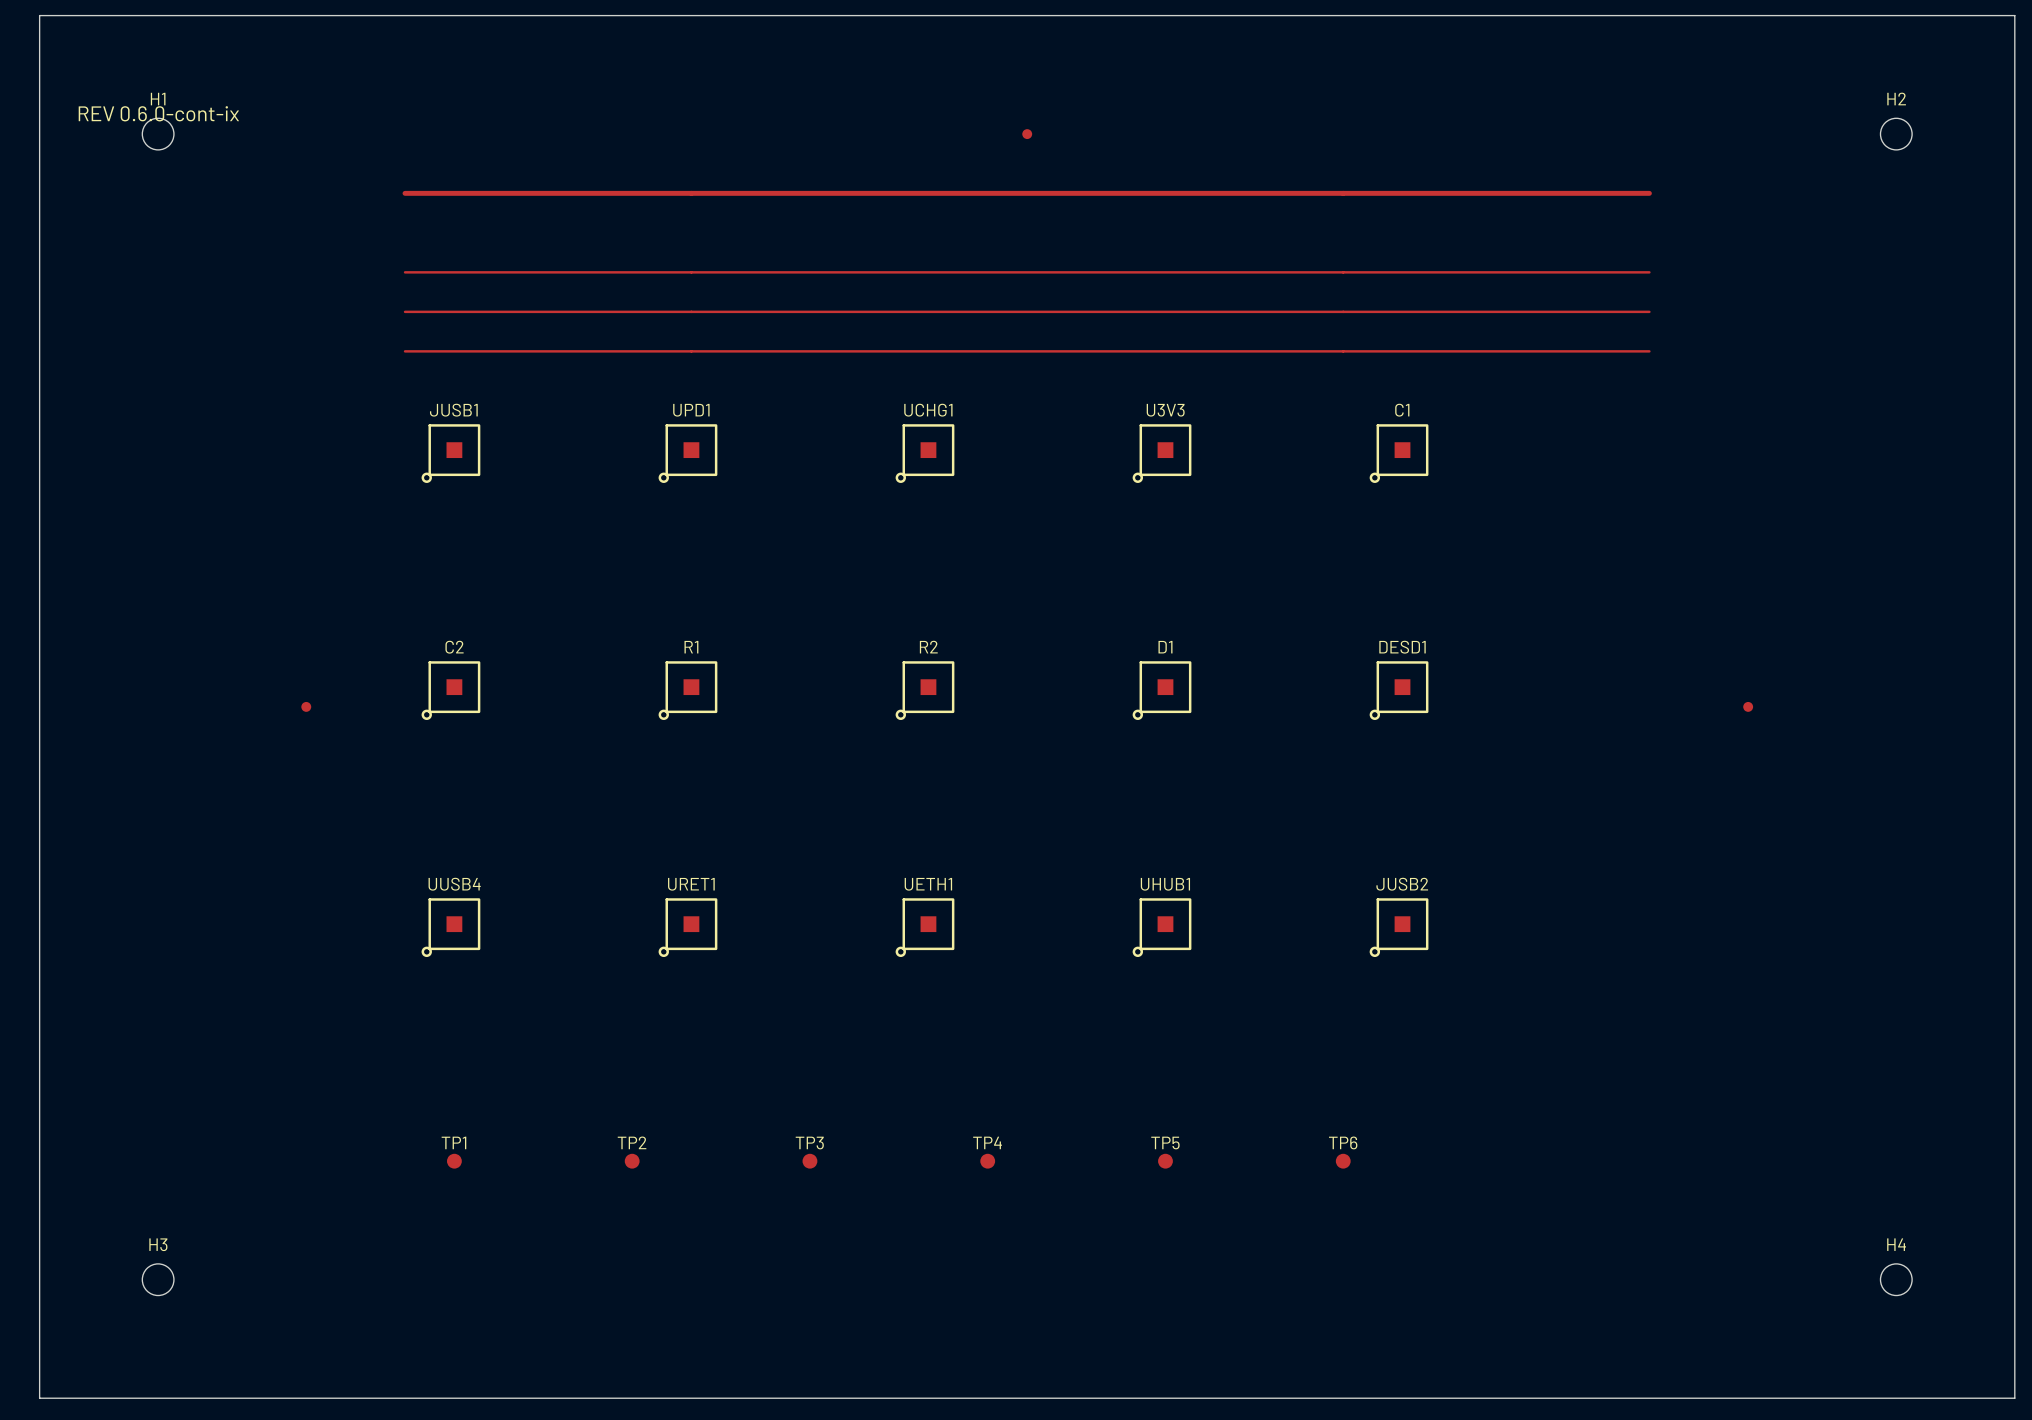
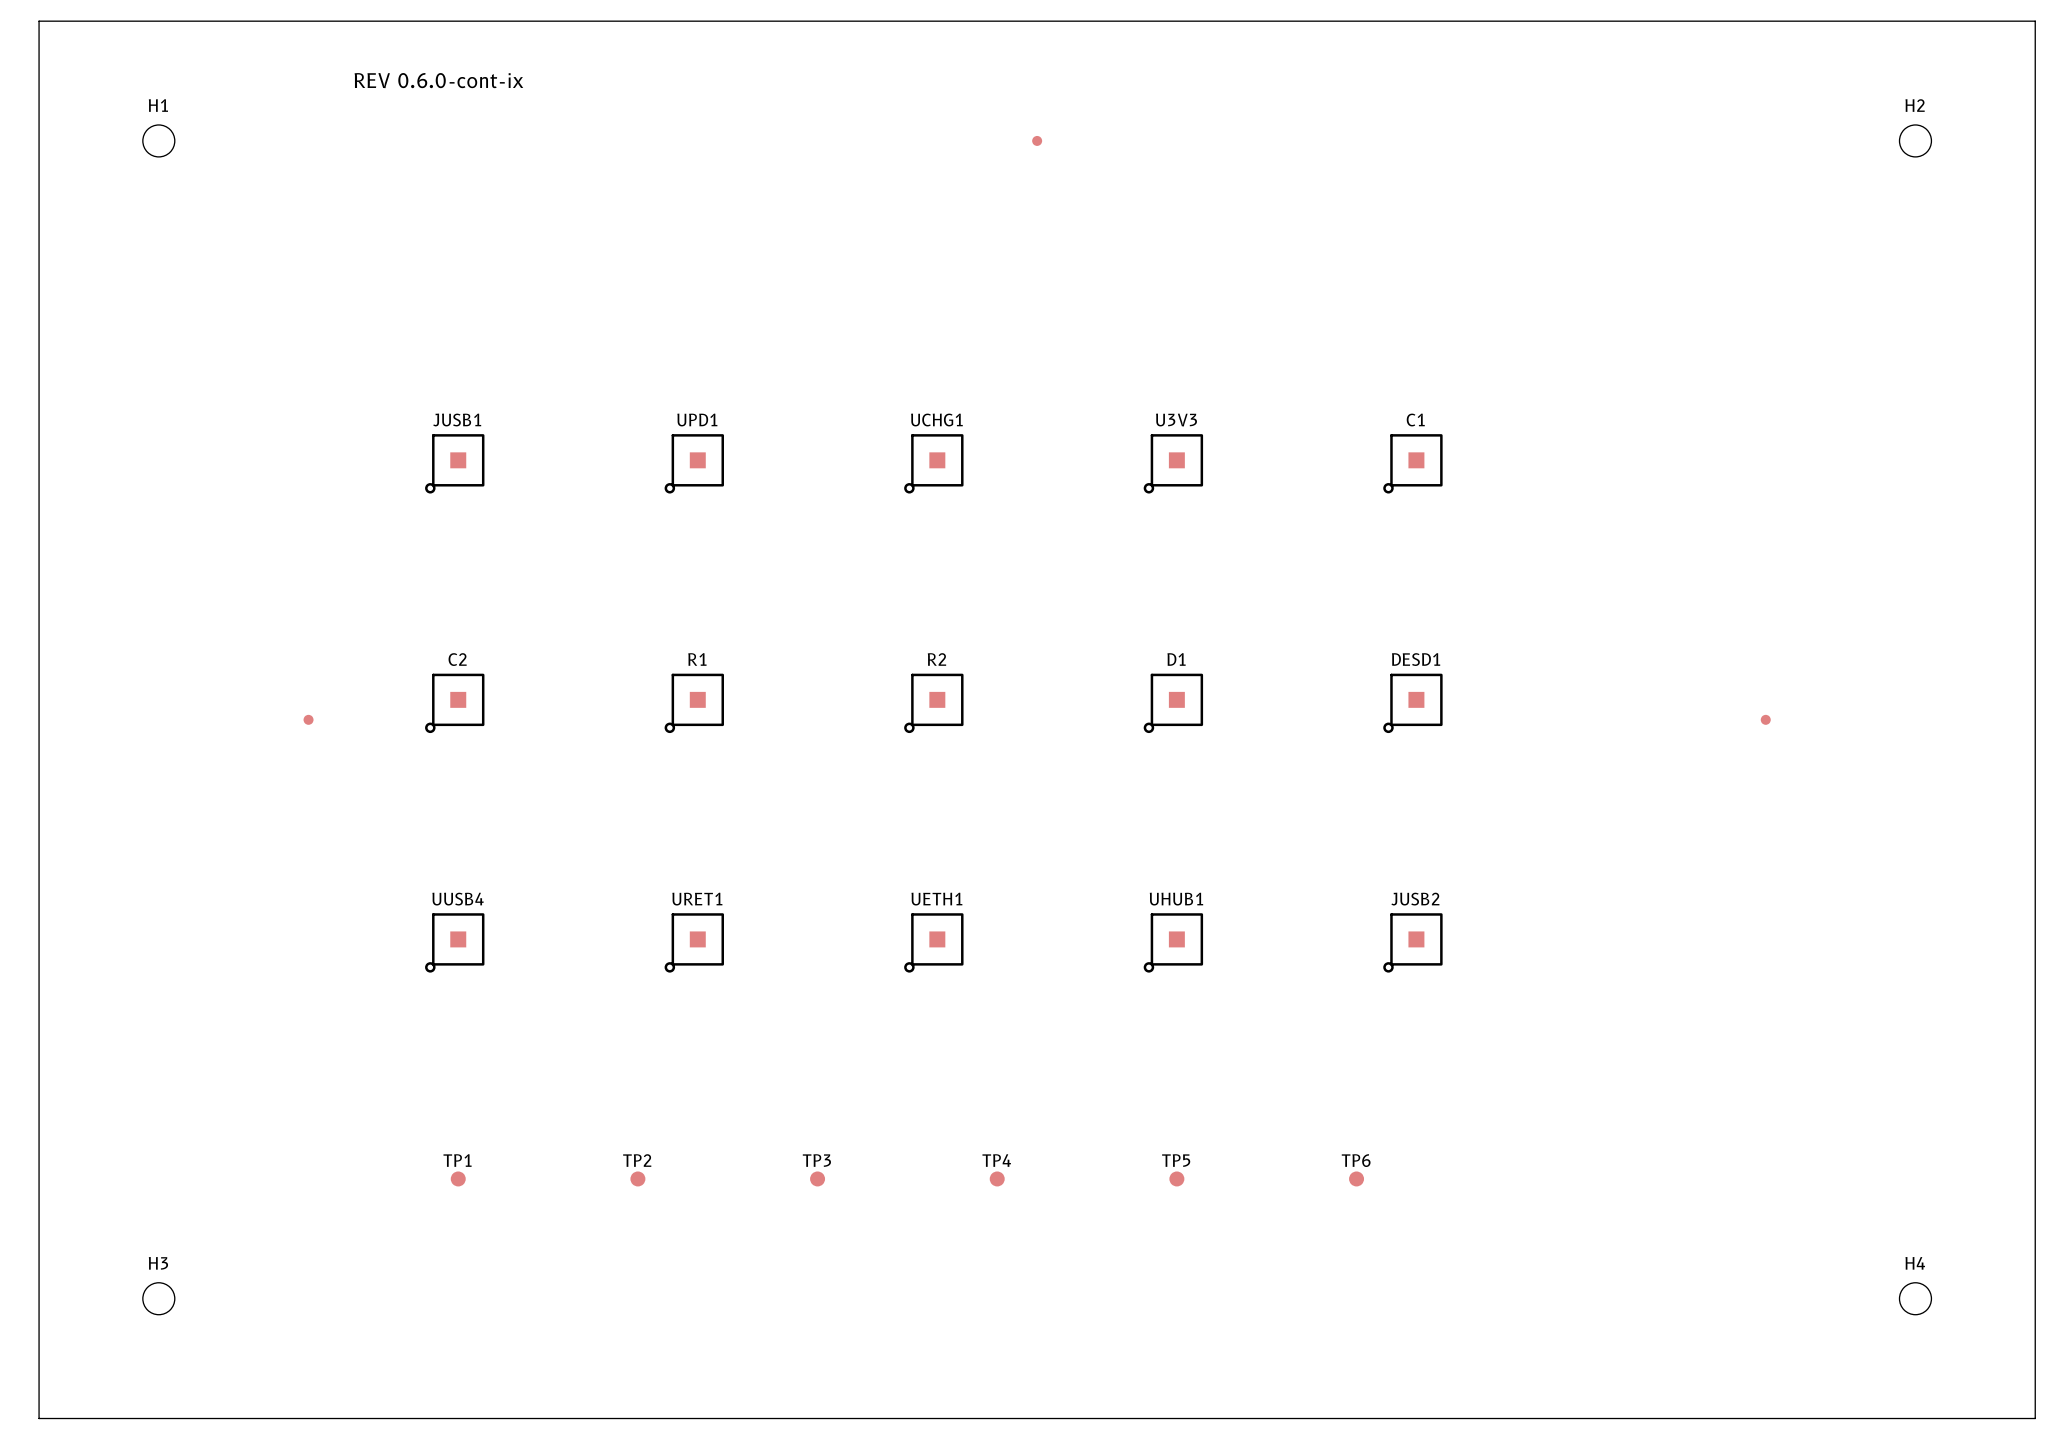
text: none -> REV 0.6.0-cont-ix (438, 80)
text: REV 0.6.0-cont-ix (158, 113) -> none
track: (405, 193) (1649, 193) -> none
track: (405, 272) (1649, 272) -> none
track: (405, 311) (1649, 311) -> none
track: (405, 351) (1649, 351) -> none

